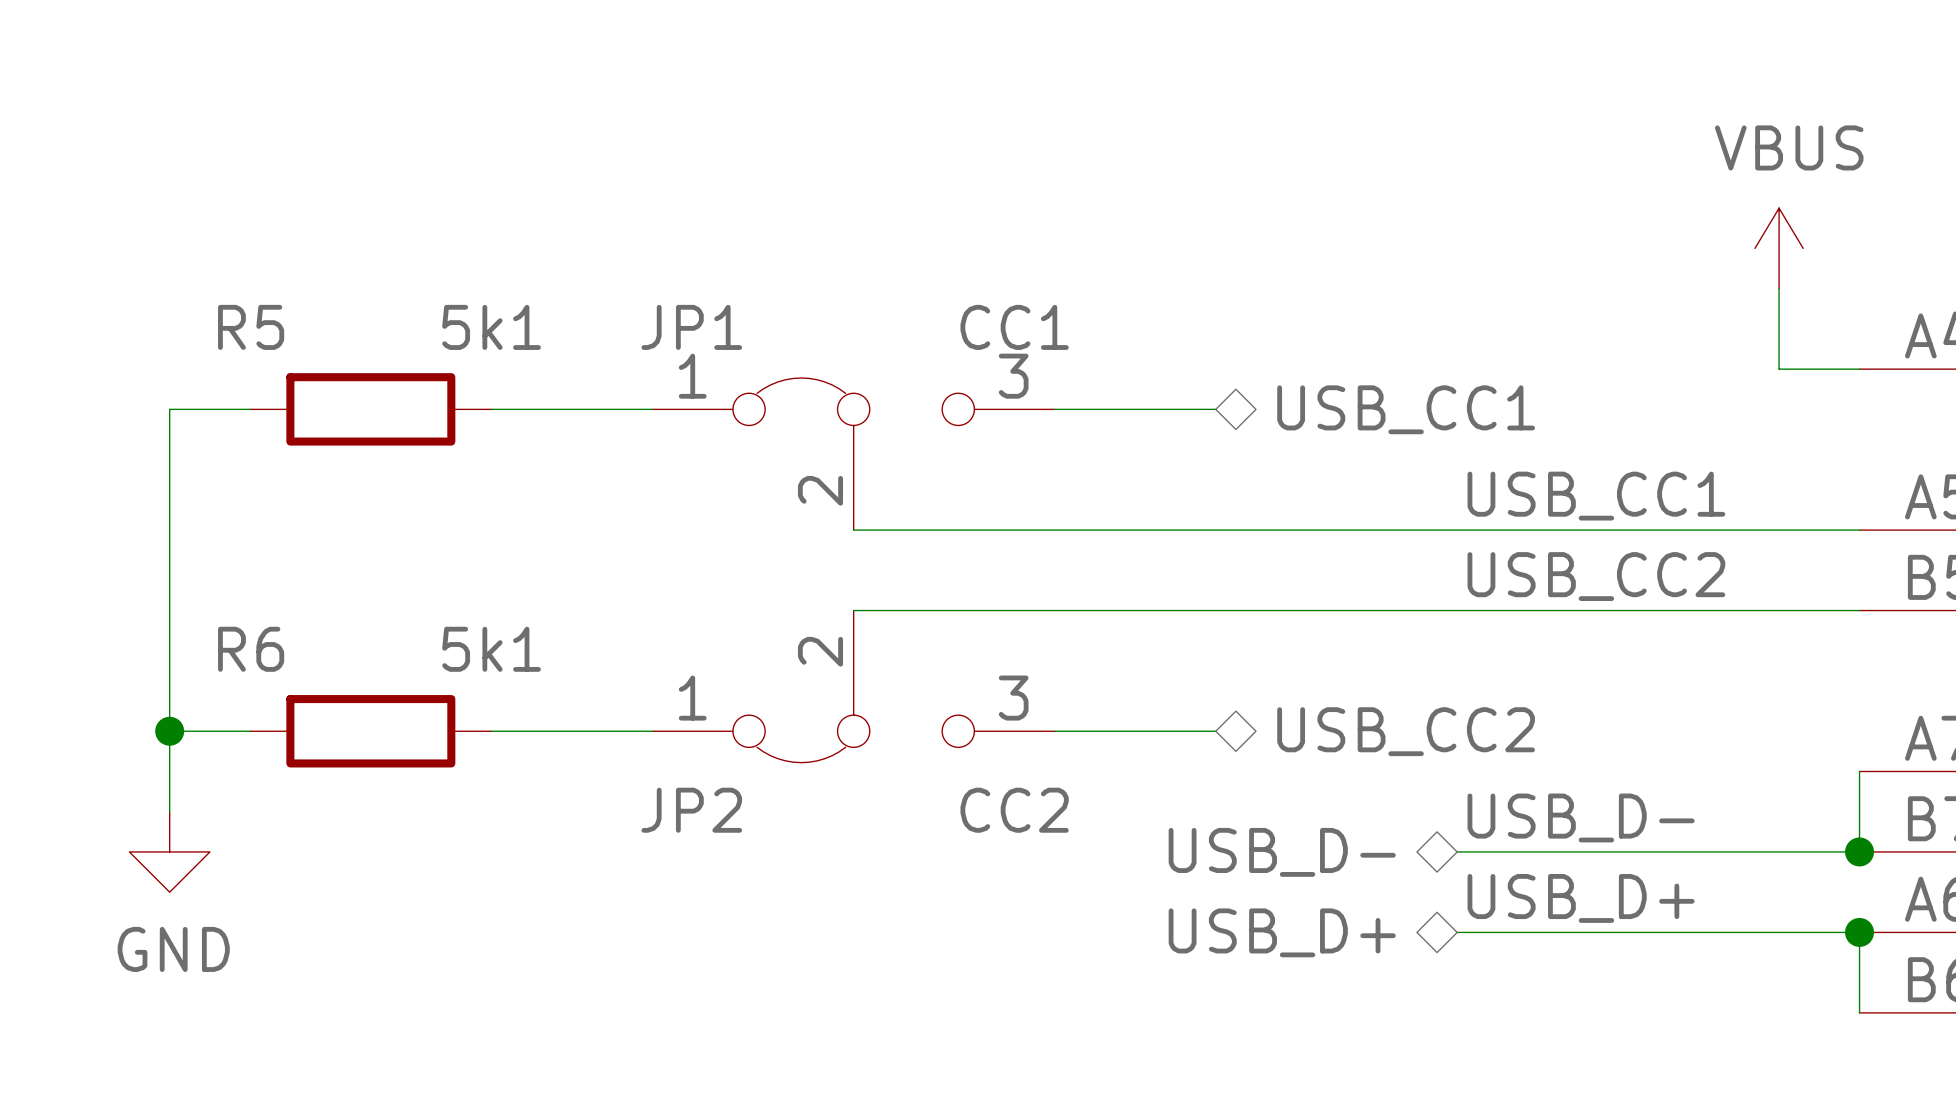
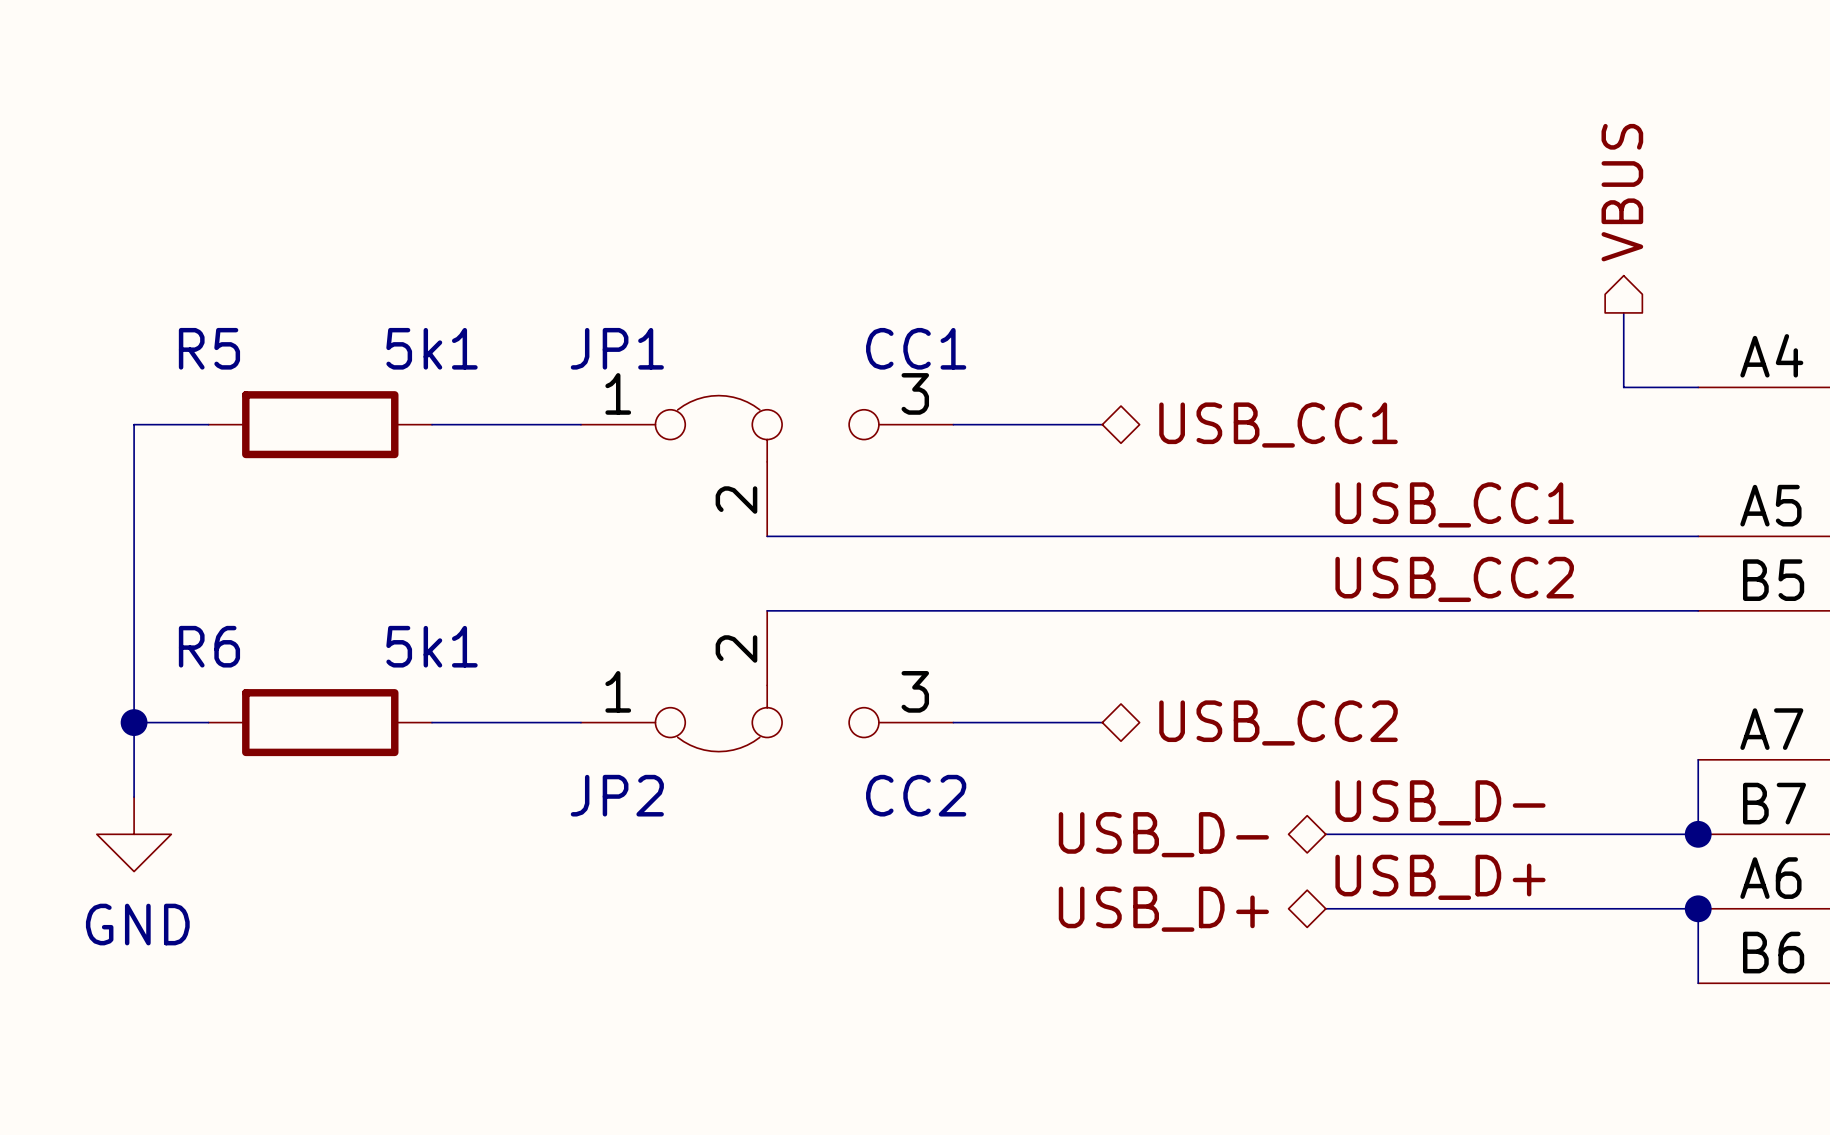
hierarchical label: none -> VBUS (1622, 192)
power symbol: VBUS (1779, 248) -> none

